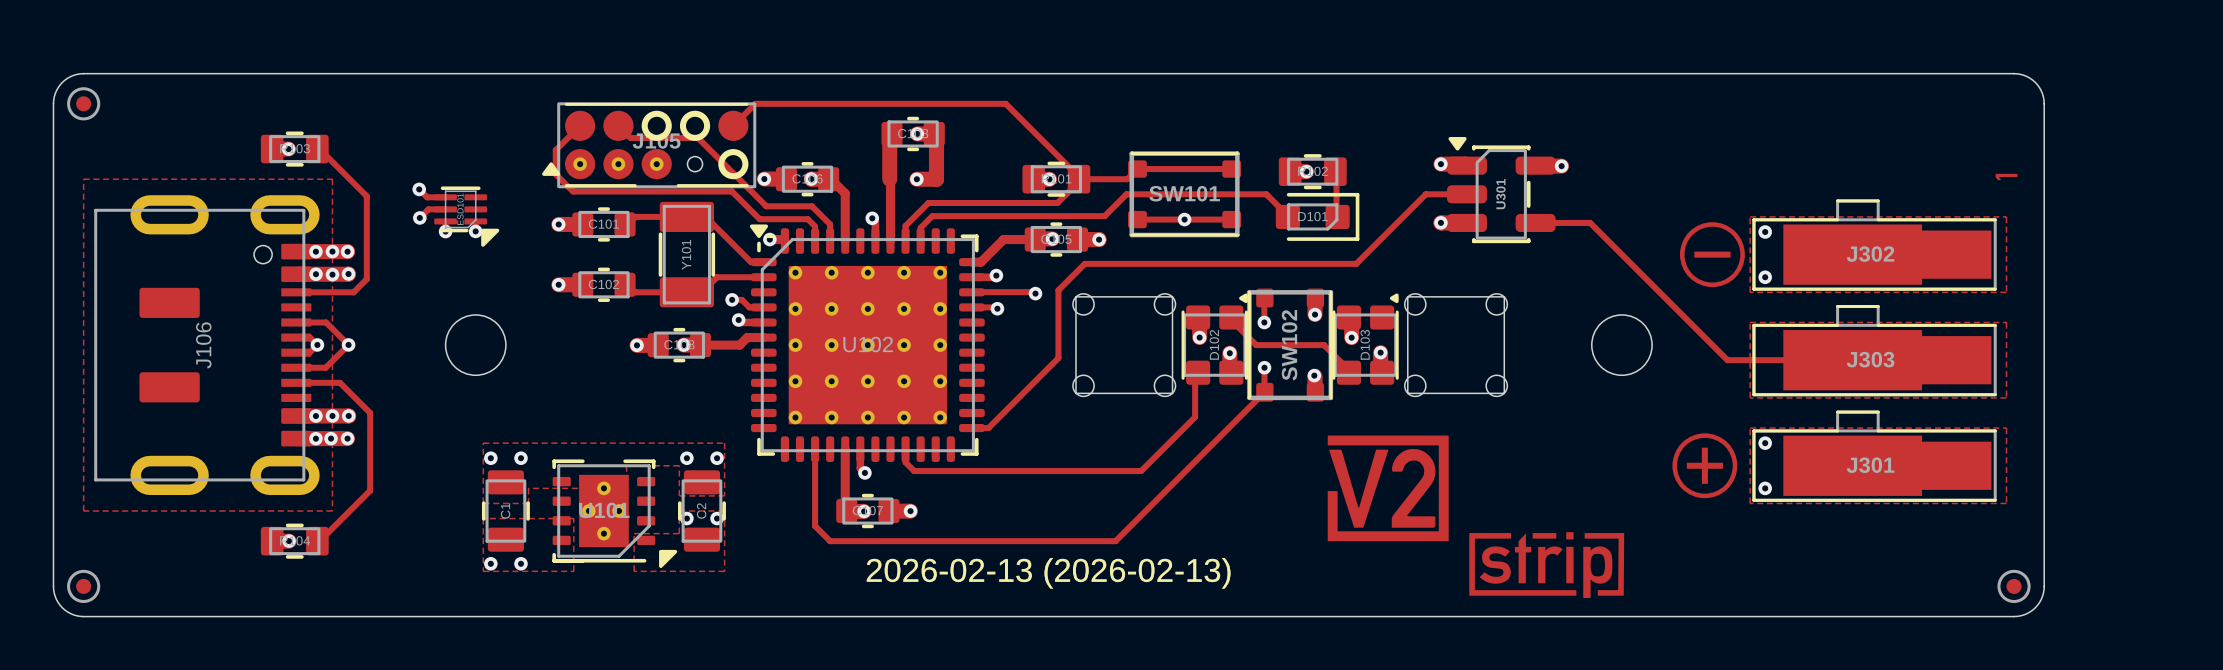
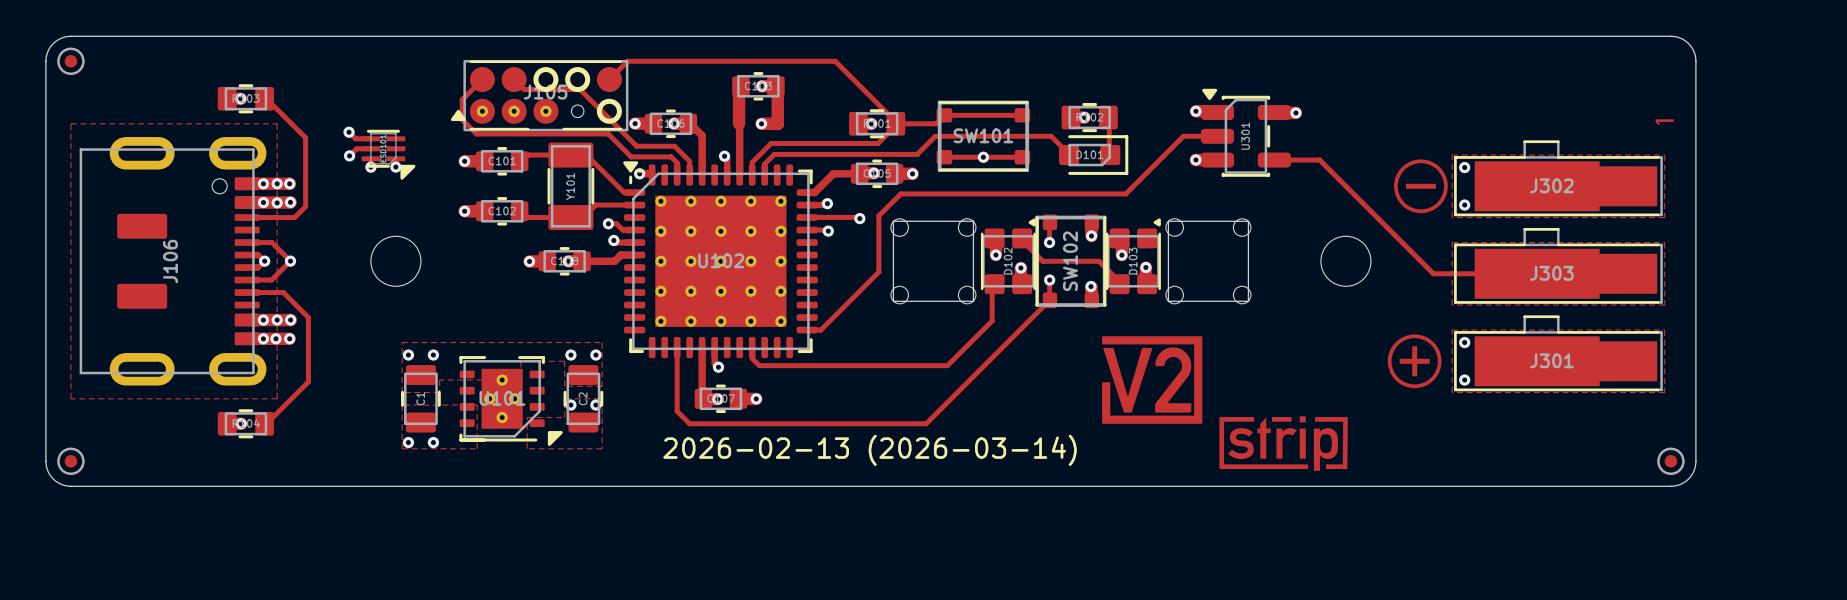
J302 footprint: [1752, 199, 1997, 291] -> [1454, 140, 1663, 217]
J303 footprint: [1752, 305, 1997, 397] -> [1454, 228, 1663, 304]
J301 footprint: [1752, 410, 1997, 502] -> [1454, 315, 1663, 392]
drawing shape: [866, 557, 1231, 589] -> [663, 434, 1077, 466]

